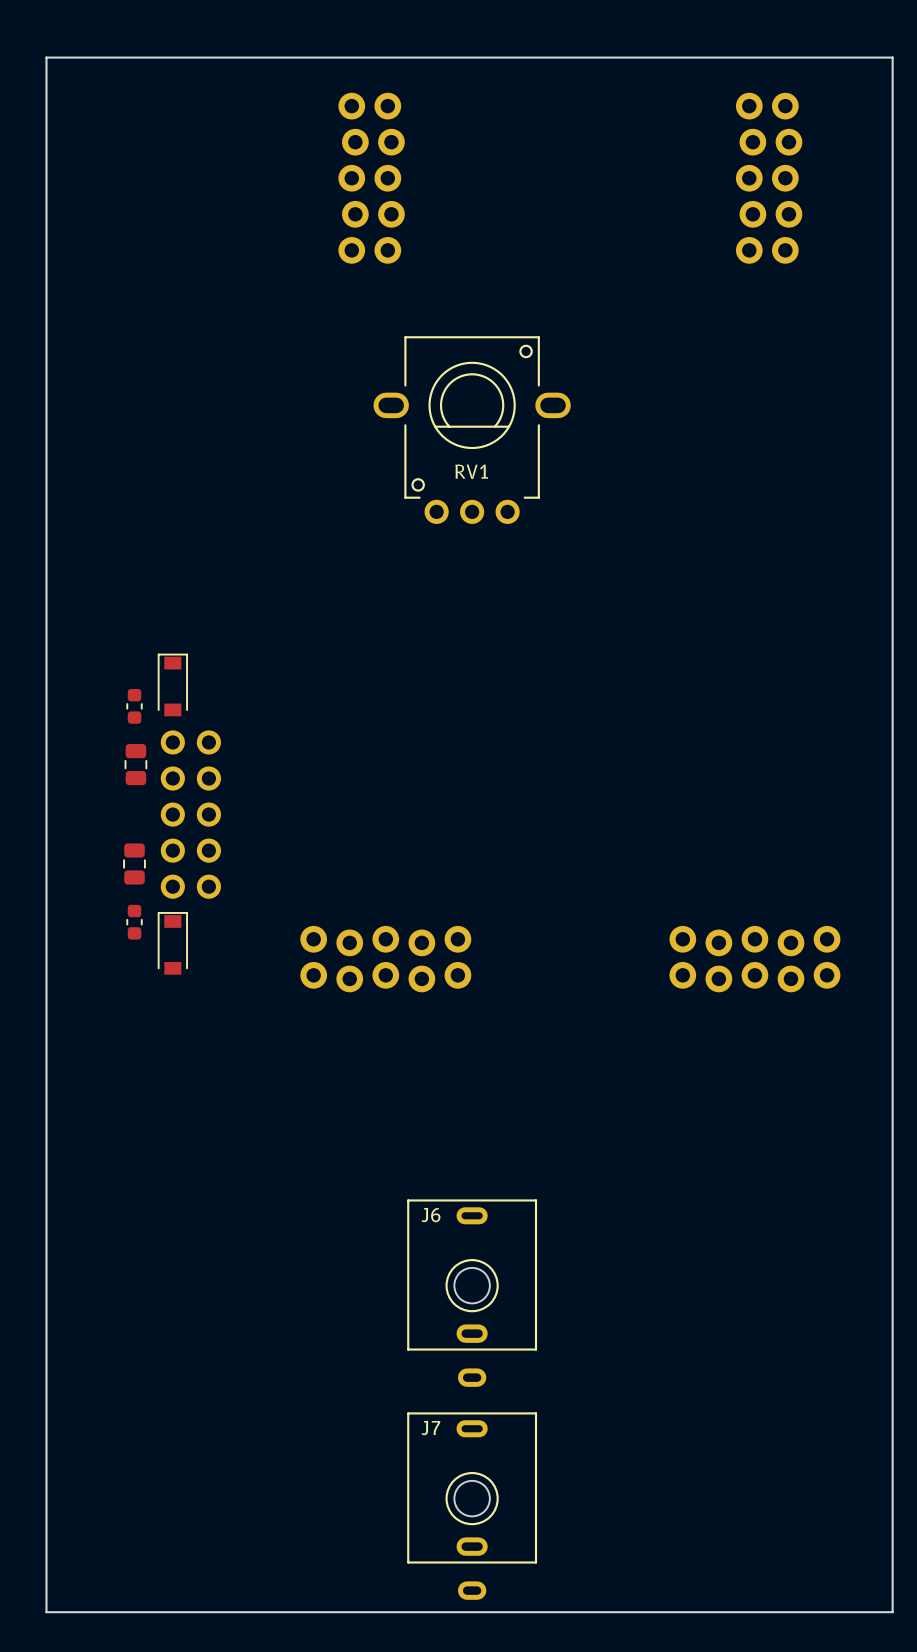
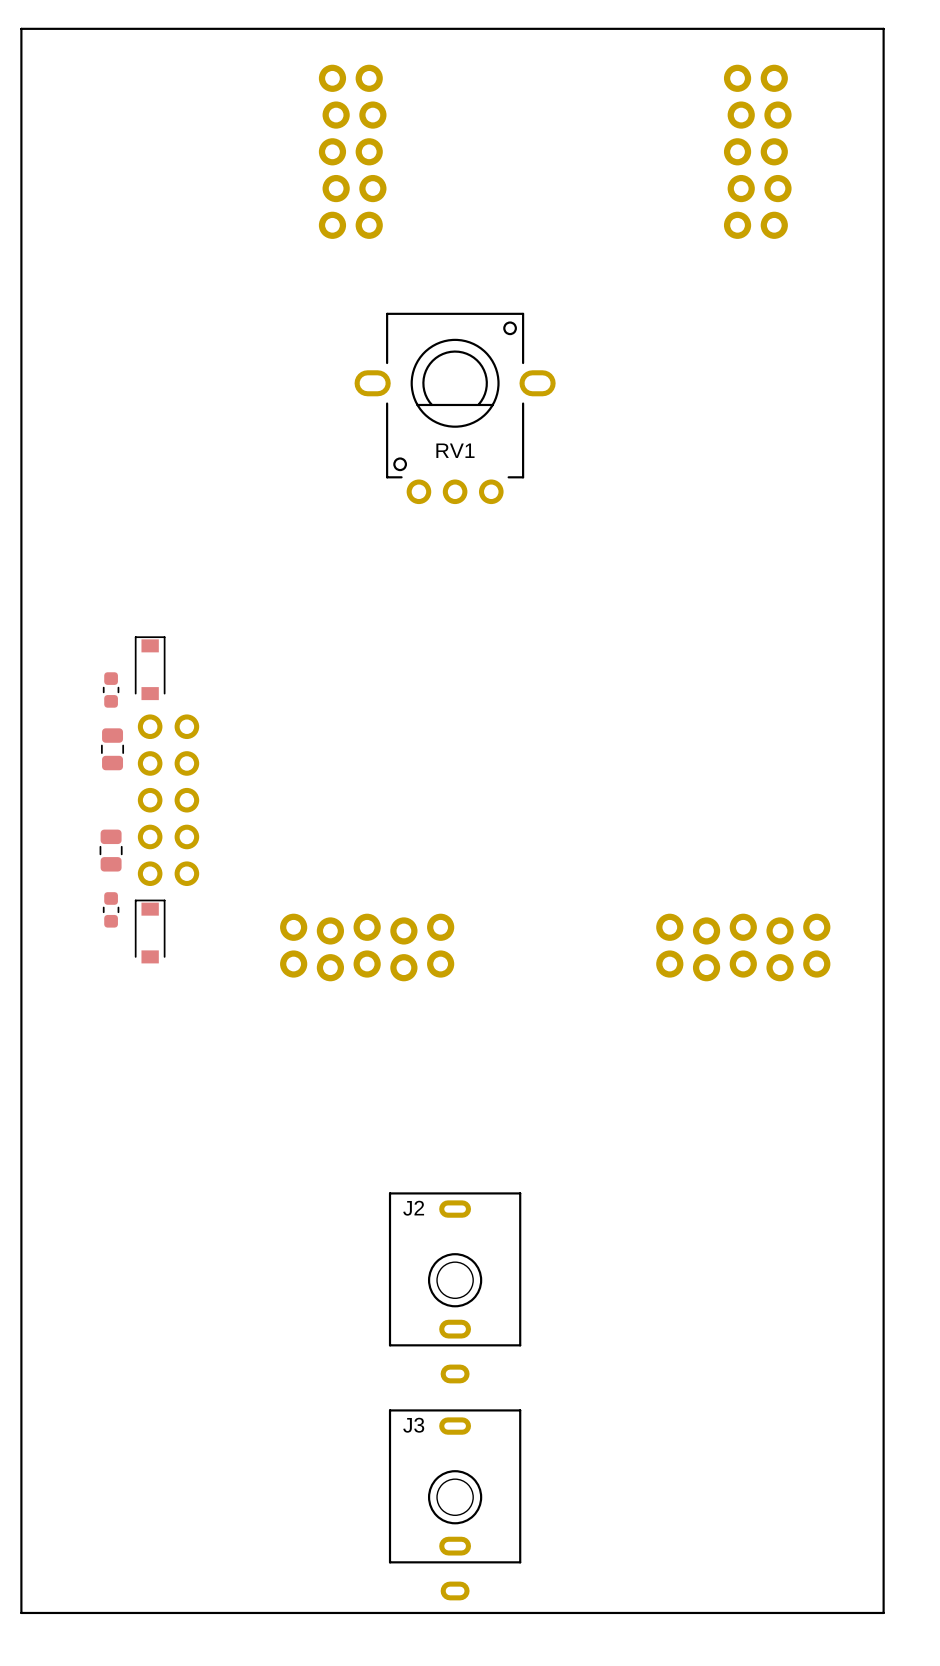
J6 name: J6 (430, 1215) -> J2 (413, 1208)
J7 name: J7 (430, 1428) -> J3 (413, 1425)

